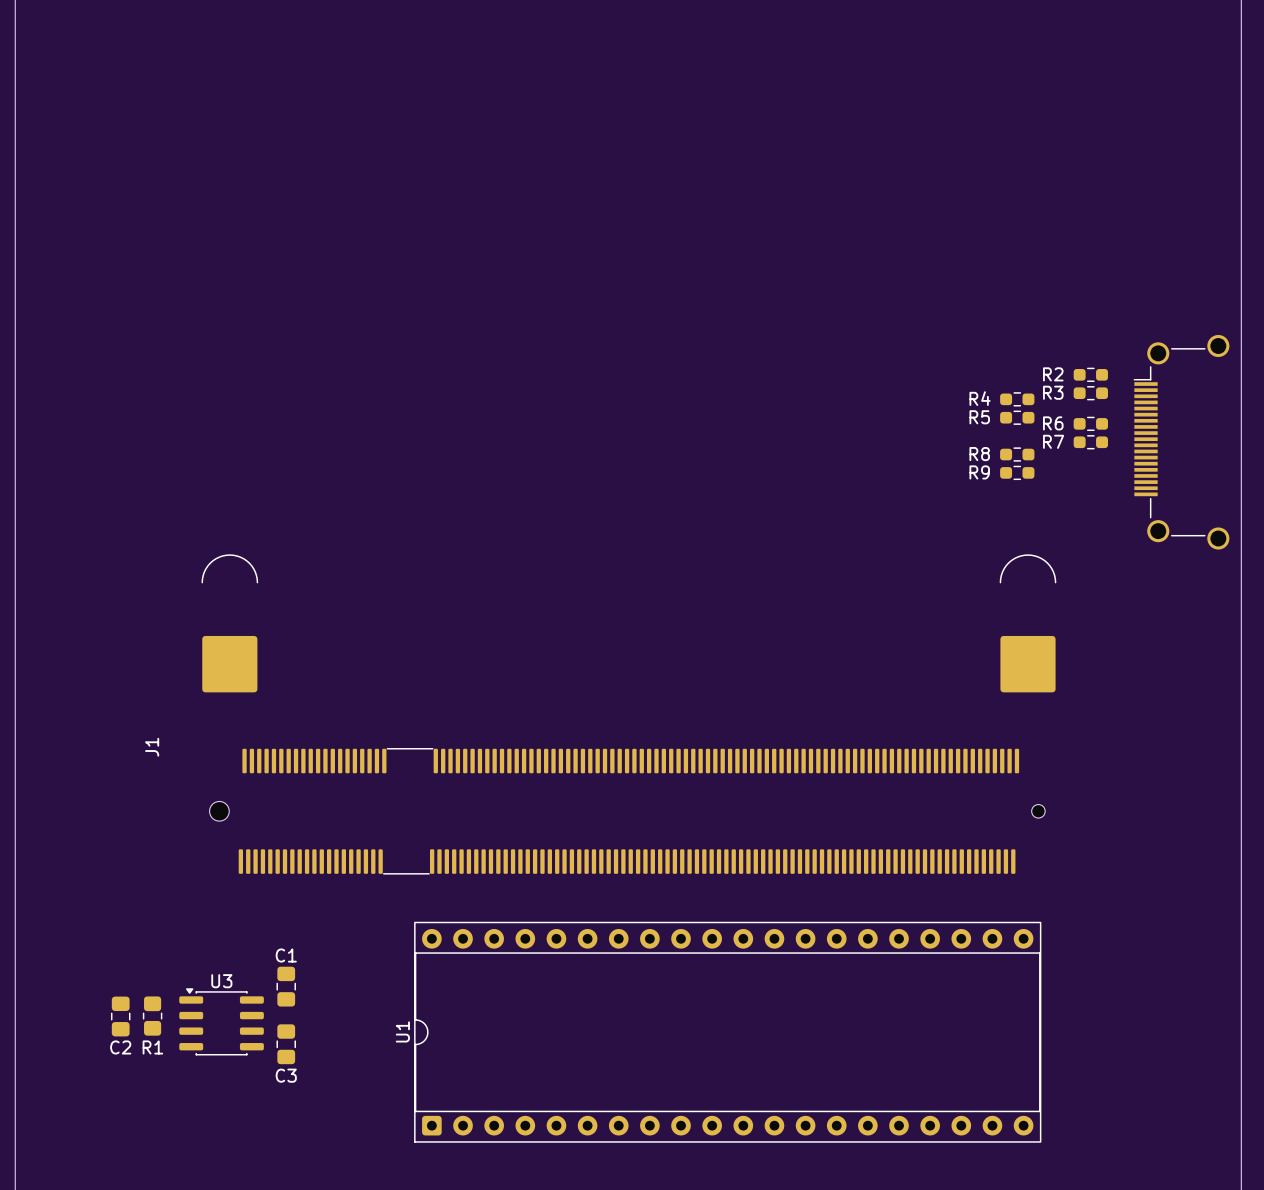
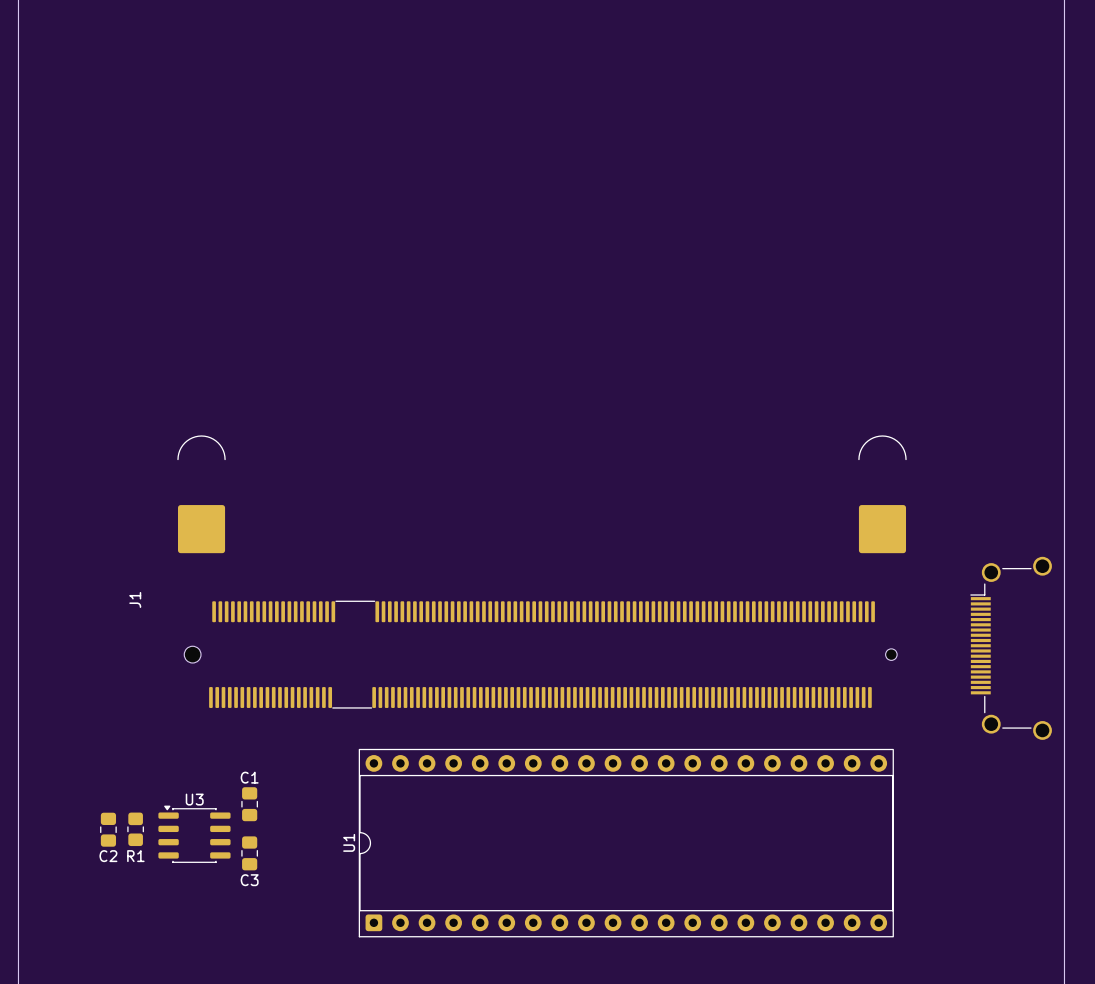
R2: (1090, 374) -> none
R3: (1090, 393) -> none
R4: (1017, 399) -> none
R5: (1017, 417) -> none
R6: (1090, 423) -> none
R7: (1090, 442) -> none
part: (1181, 442) -> none
R8: (1017, 454) -> none
R9: (1017, 472) -> none
part: none -> (1011, 648)

